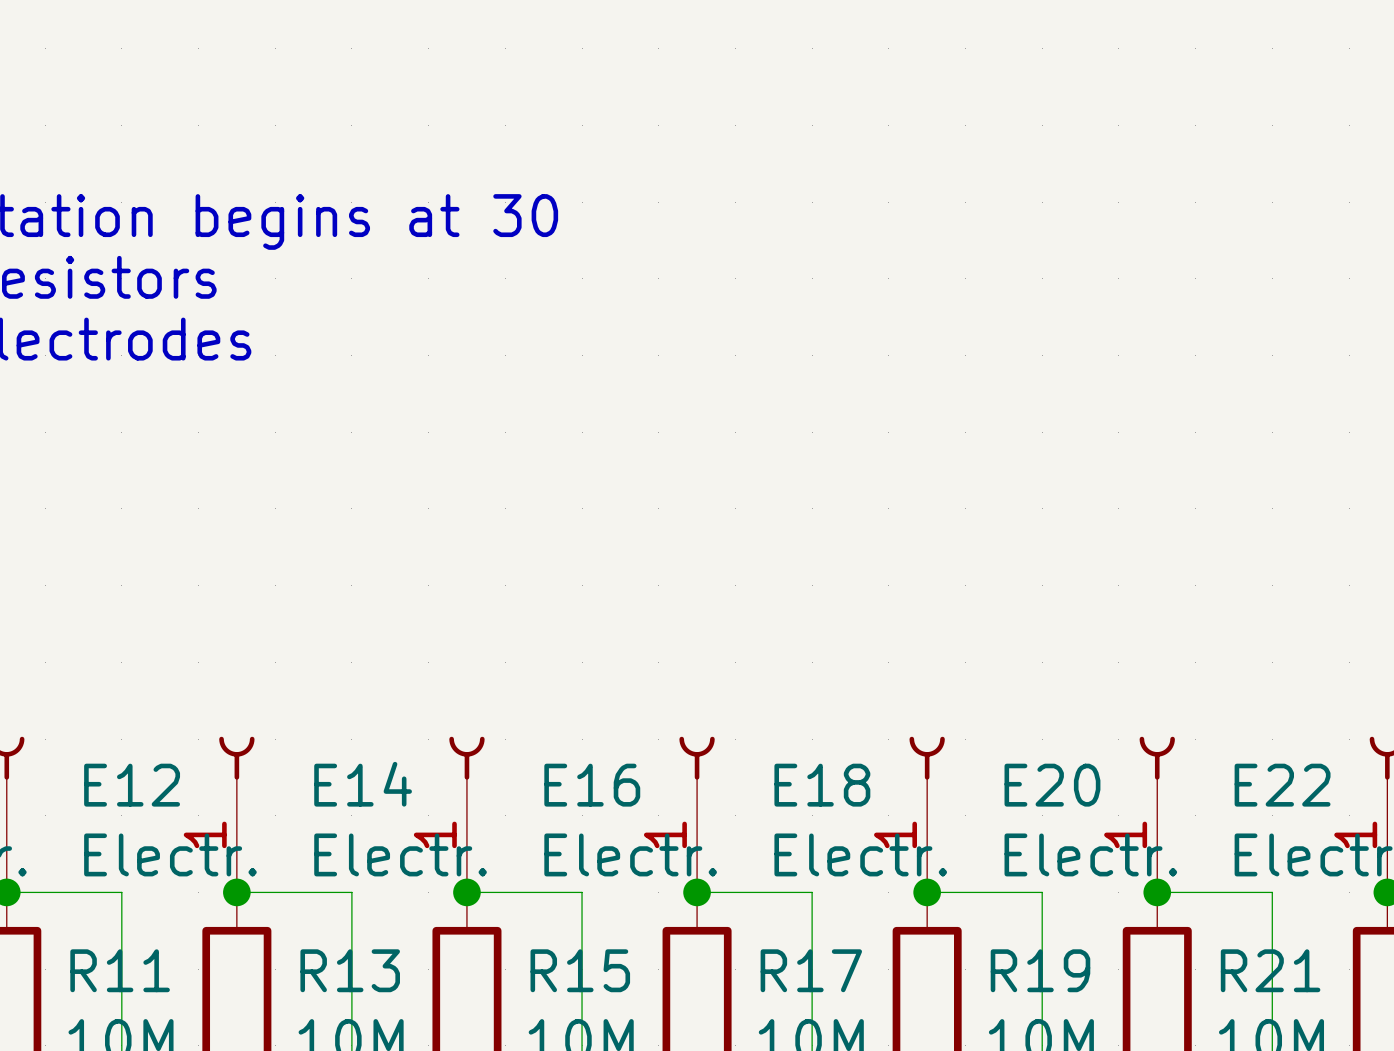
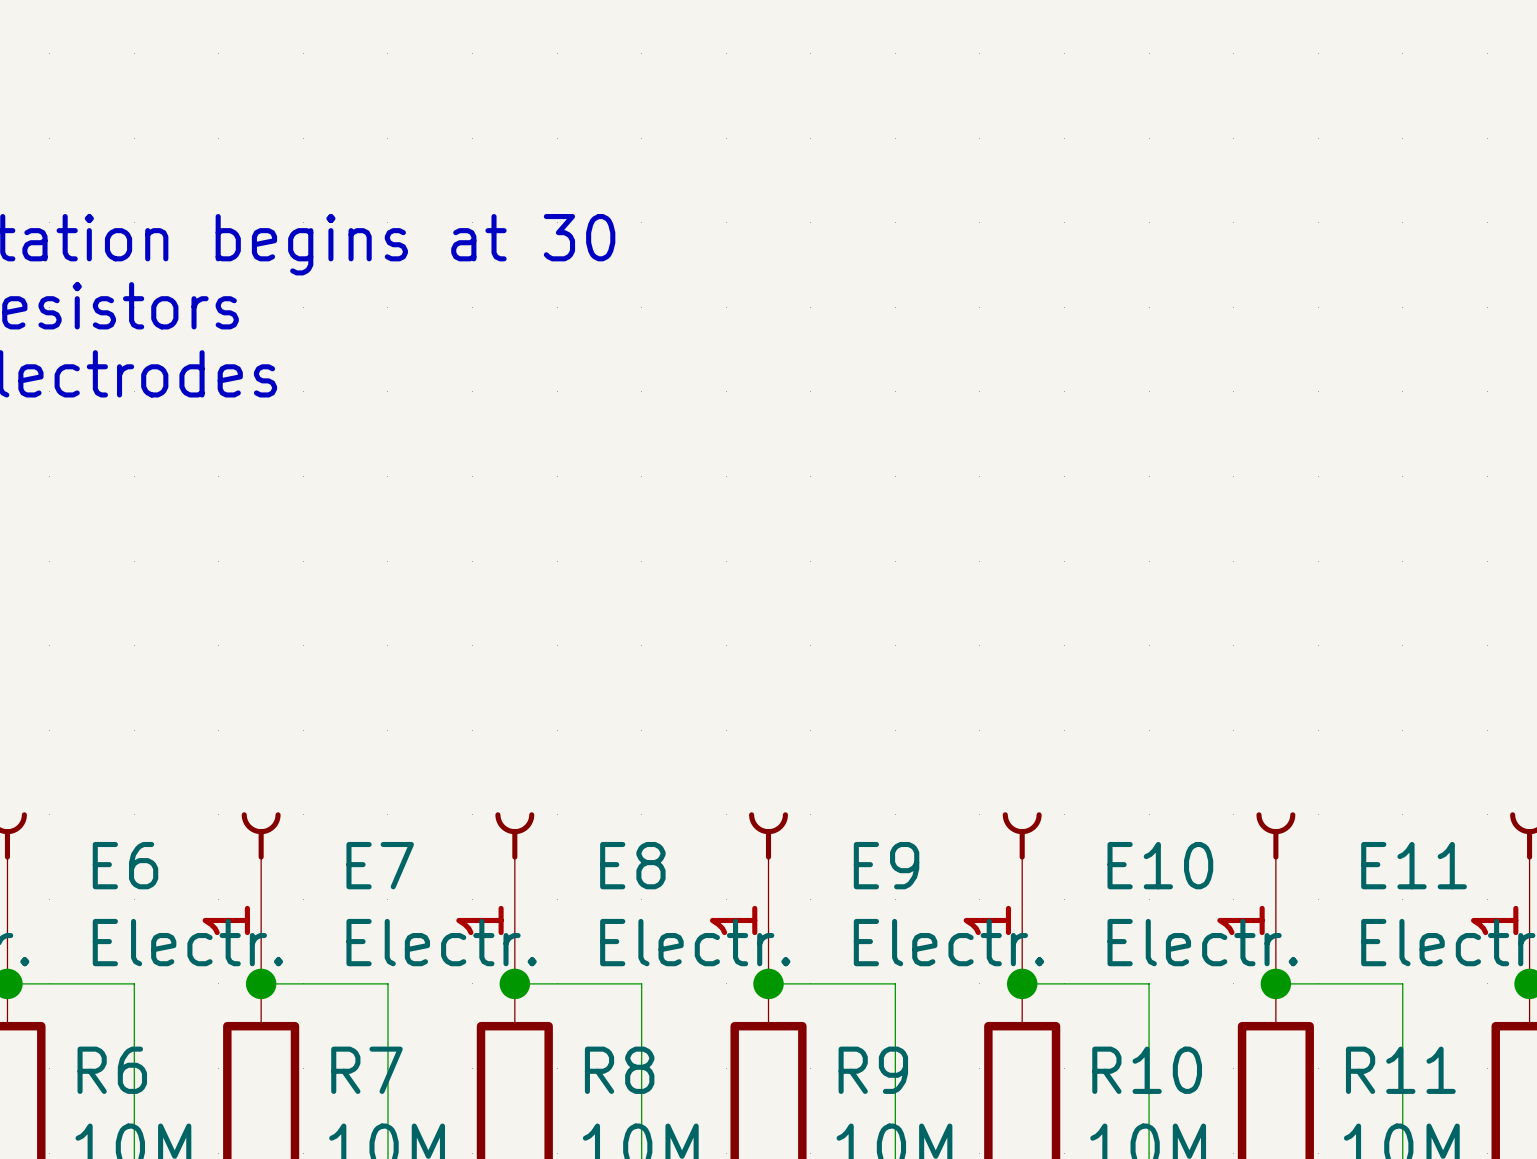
E14 name: E14 (363, 784) -> E7 (380, 865)
E12 name: E12 (132, 785) -> E6 (125, 865)
E16 name: E16 (592, 785) -> E8 (632, 865)
E18 name: E18 (822, 785) -> E9 (886, 865)
E20 name: E20 (1052, 785) -> E10 (1160, 865)
E22 name: E22 (1282, 785) -> E11 (1414, 865)
R11 name: R11 (120, 970) -> R6 (112, 1070)
R13 name: R13 (350, 970) -> R7 (366, 1070)
R15 name: R15 (580, 970) -> R8 (619, 1070)
R17 name: R17 (811, 970) -> R9 (873, 1070)
R19 name: R19 (1040, 970) -> R10 (1147, 1070)
R21 name: R21 (1270, 970) -> R11 (1400, 1070)

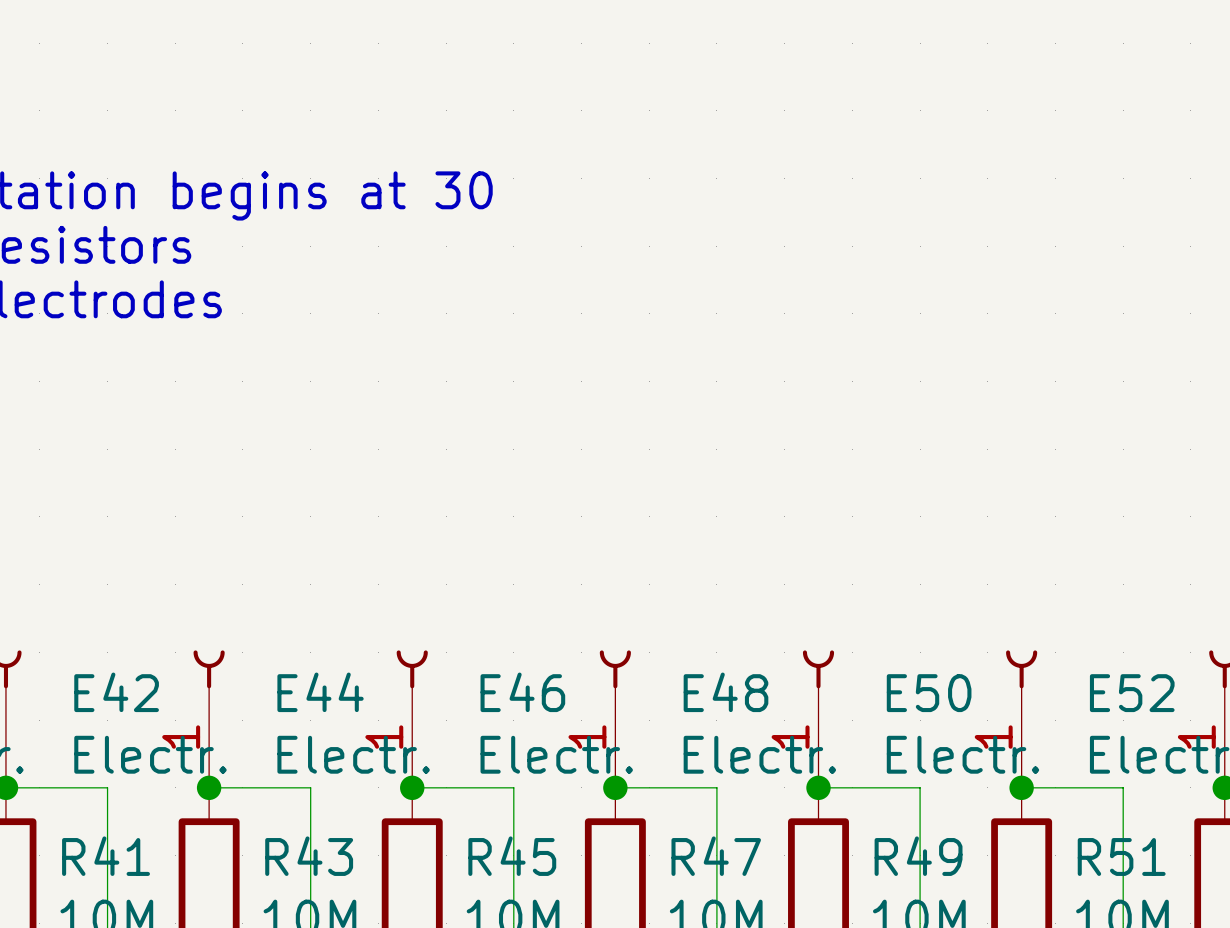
E6 name: E6 (125, 865) -> E42 (116, 692)
E7 name: E7 (380, 865) -> E44 (320, 692)
E8 name: E8 (632, 865) -> E46 (522, 692)
E9 name: E9 (886, 865) -> E48 (725, 692)
E10 name: E10 (1160, 865) -> E50 (929, 693)
E11 name: E11 (1414, 865) -> E52 (1132, 693)
R6 name: R6 (112, 1070) -> R41 (106, 856)
R7 name: R7 (366, 1070) -> R43 (309, 856)
R8 name: R8 (619, 1070) -> R45 (512, 856)
R9 name: R9 (873, 1070) -> R47 (716, 856)
R10 name: R10 (1147, 1070) -> R49 (918, 856)
R11 name: R11 (1400, 1070) -> R51 (1121, 856)

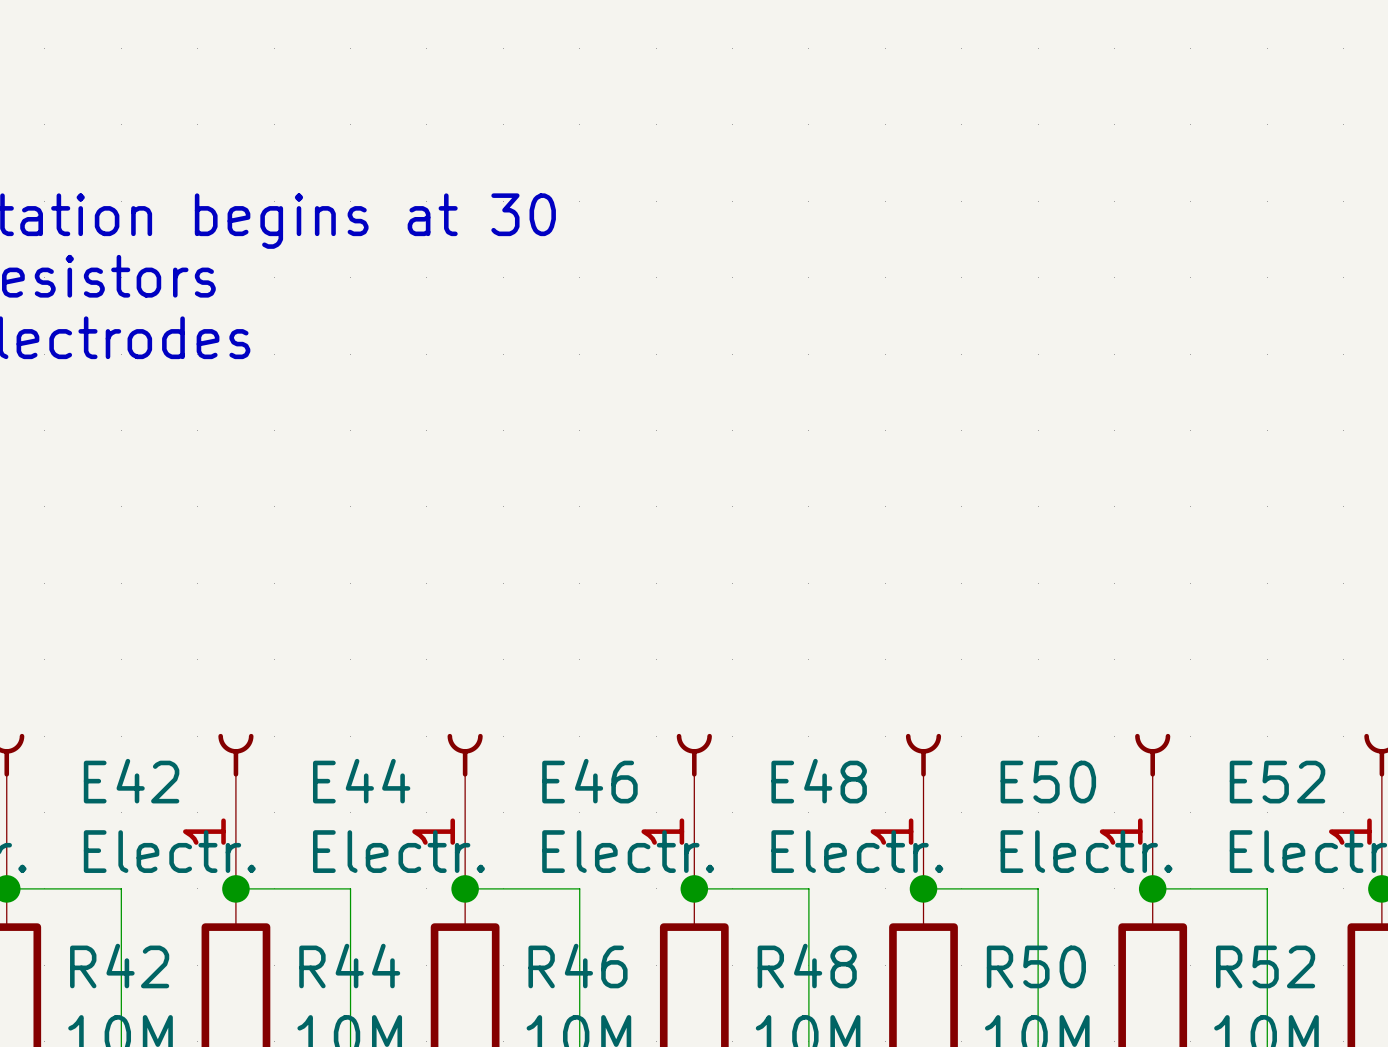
R41 name: R41 (106, 856) -> R42 (119, 966)
R43 name: R43 (309, 856) -> R44 (349, 966)
R45 name: R45 (512, 856) -> R46 (578, 966)
R47 name: R47 (716, 856) -> R48 (807, 966)
R49 name: R49 (918, 856) -> R50 (1036, 966)
R51 name: R51 (1121, 856) -> R52 (1265, 966)

